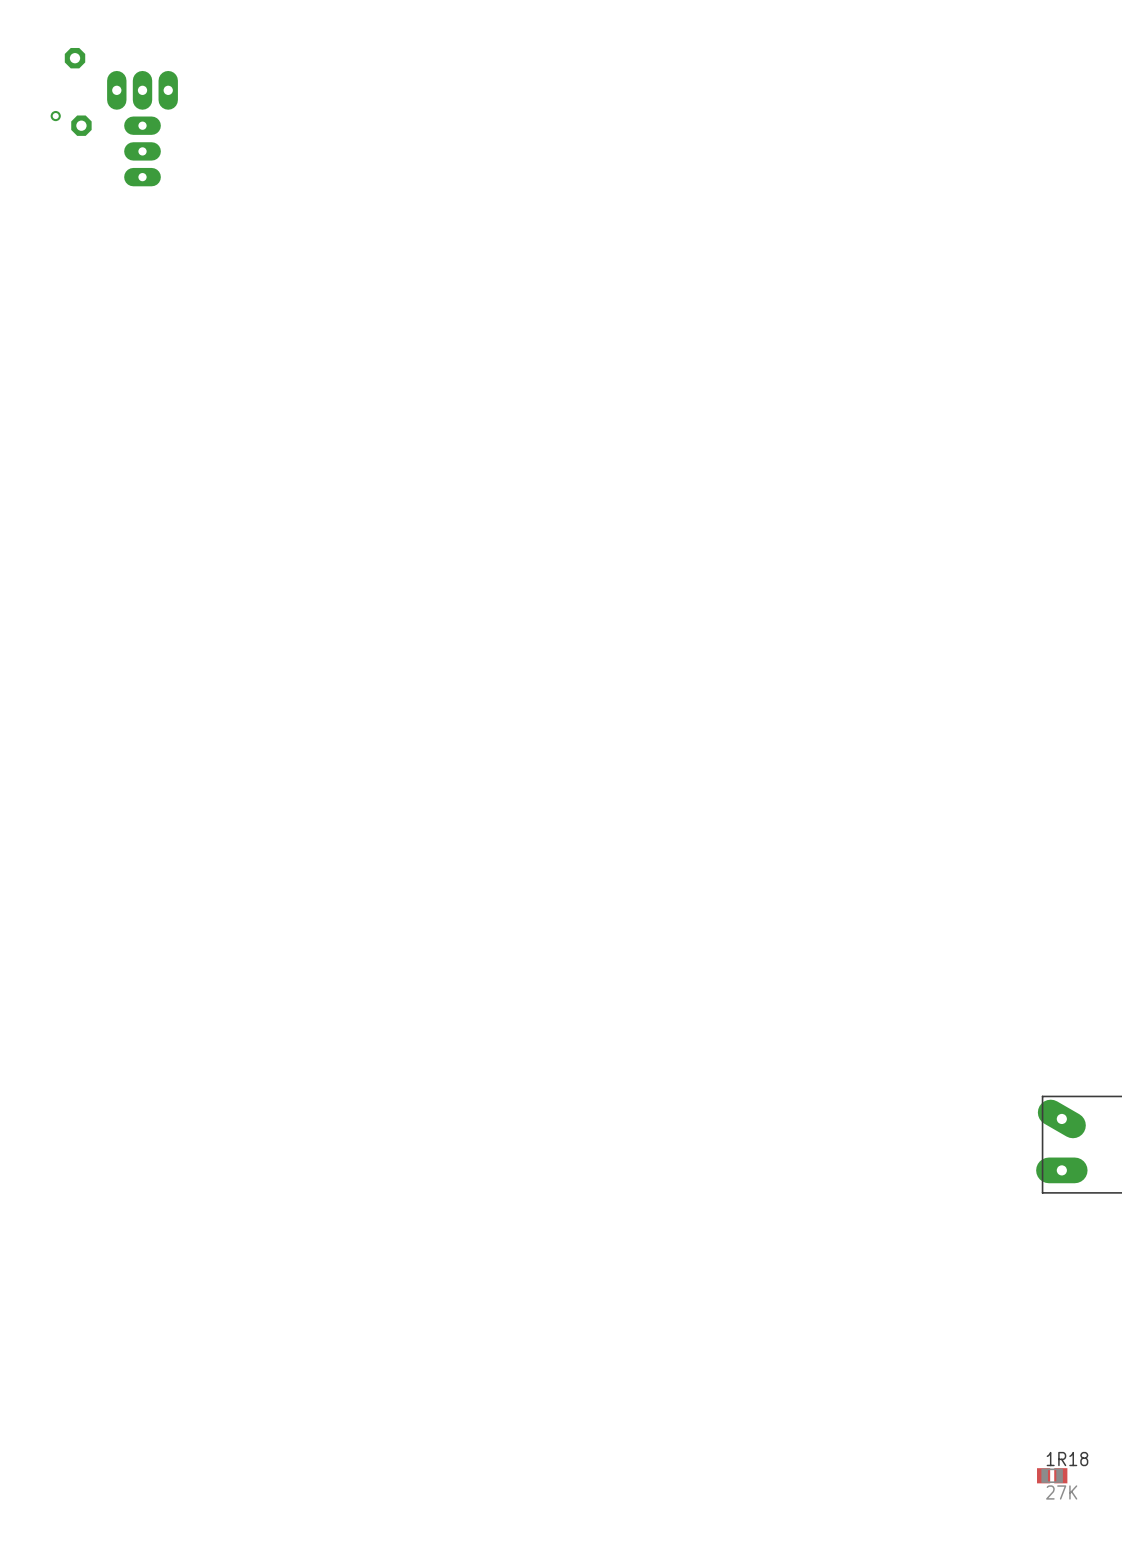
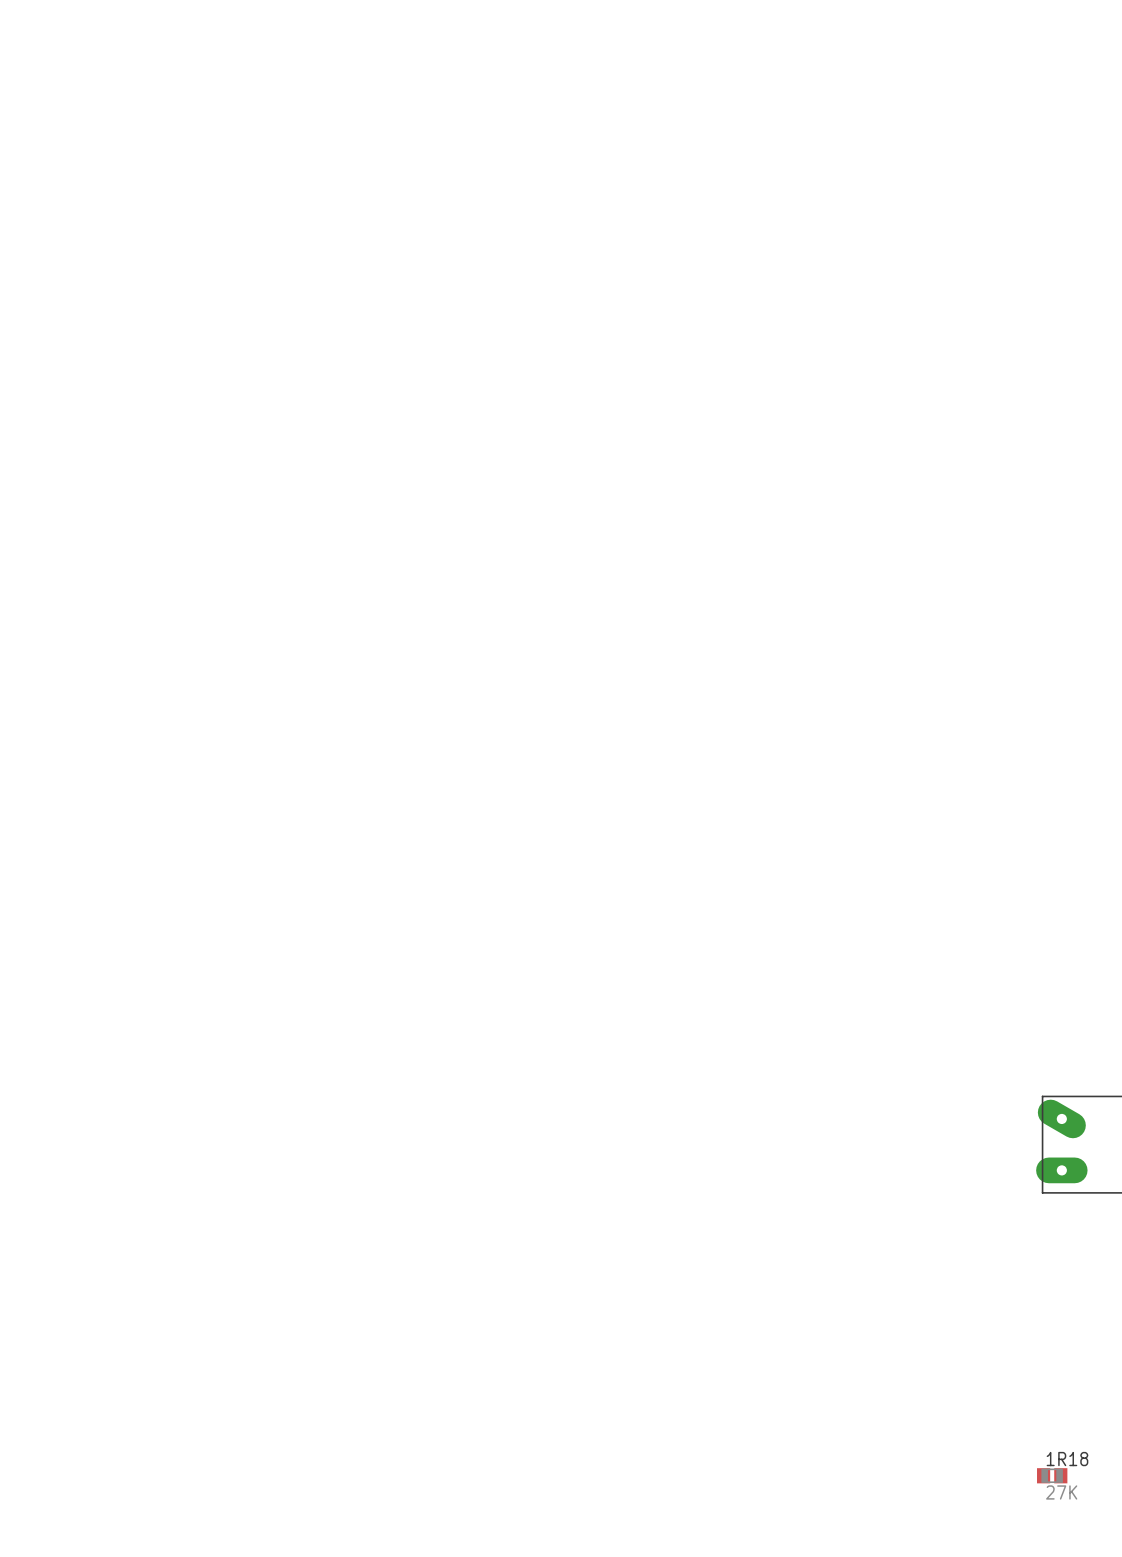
part: (75, 58) -> none
part: (142, 90) -> none
via: (55, 116) -> none
part: (81, 125) -> none
part: (142, 151) -> none

